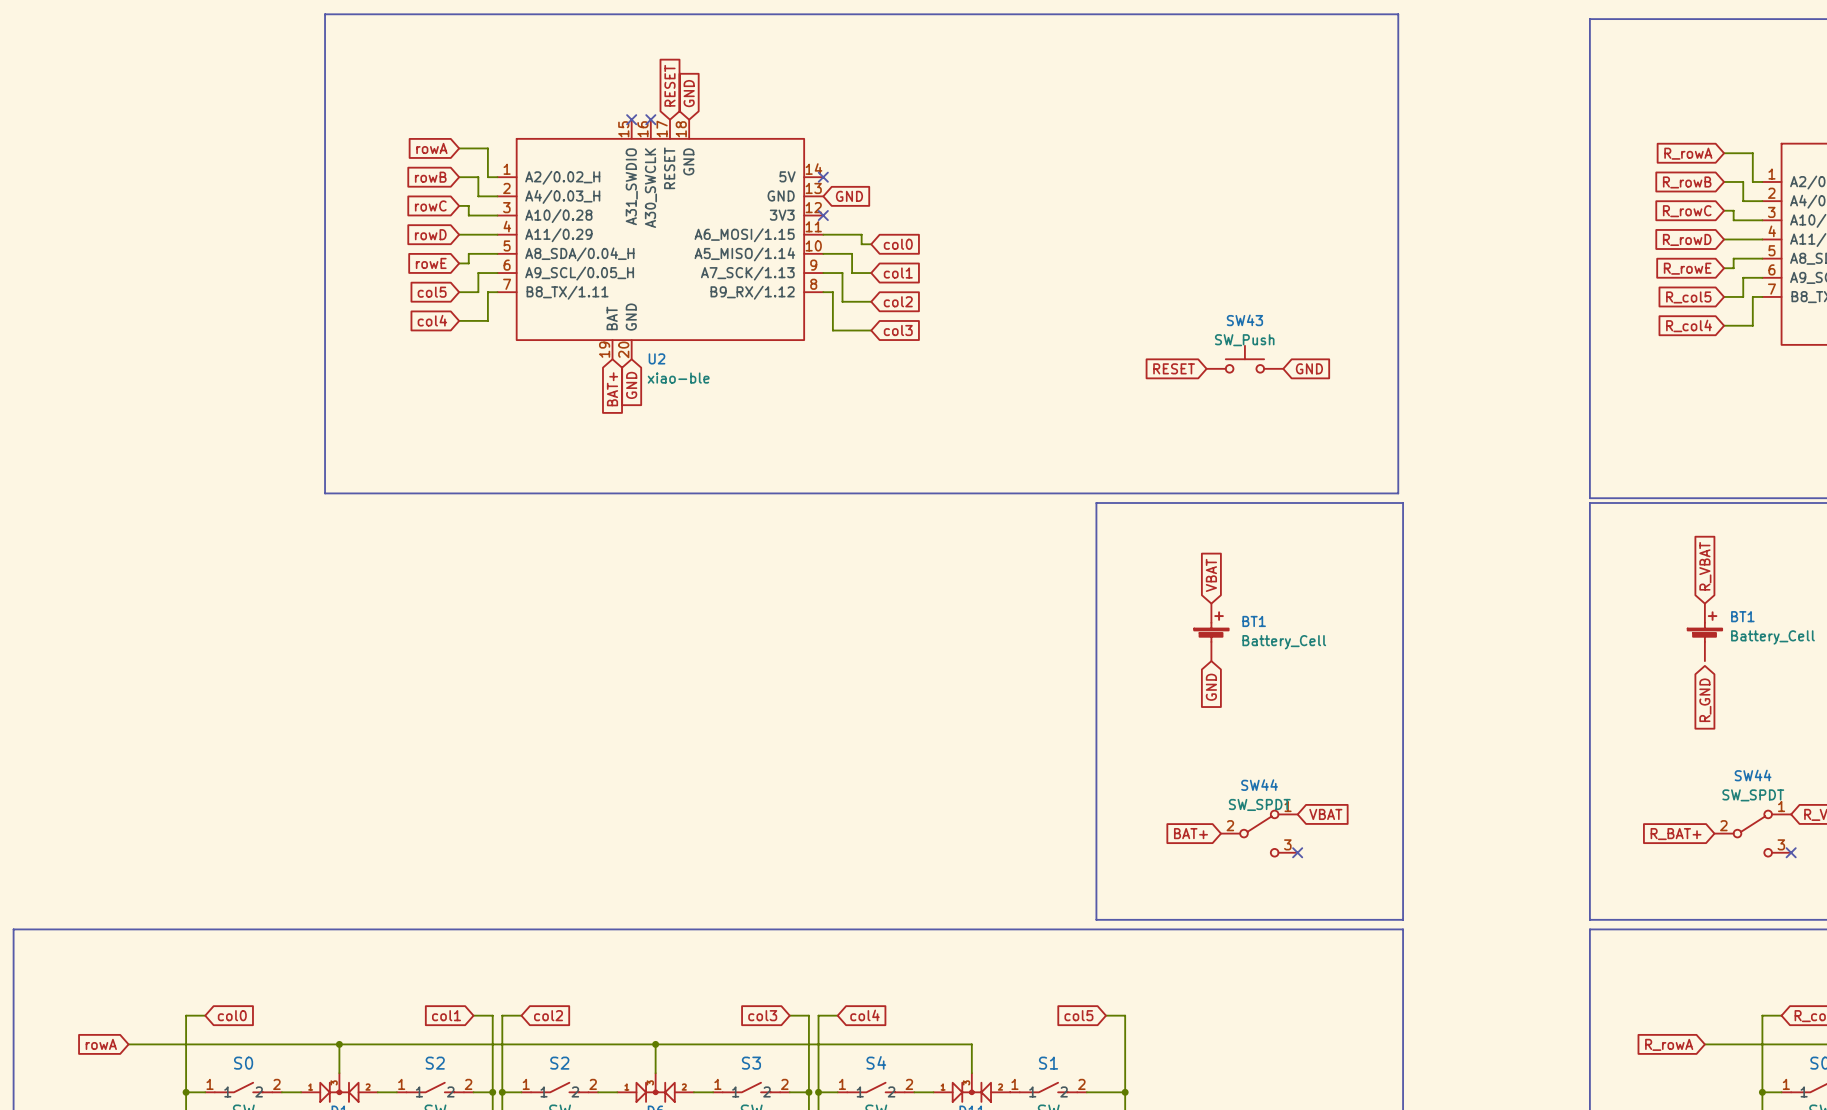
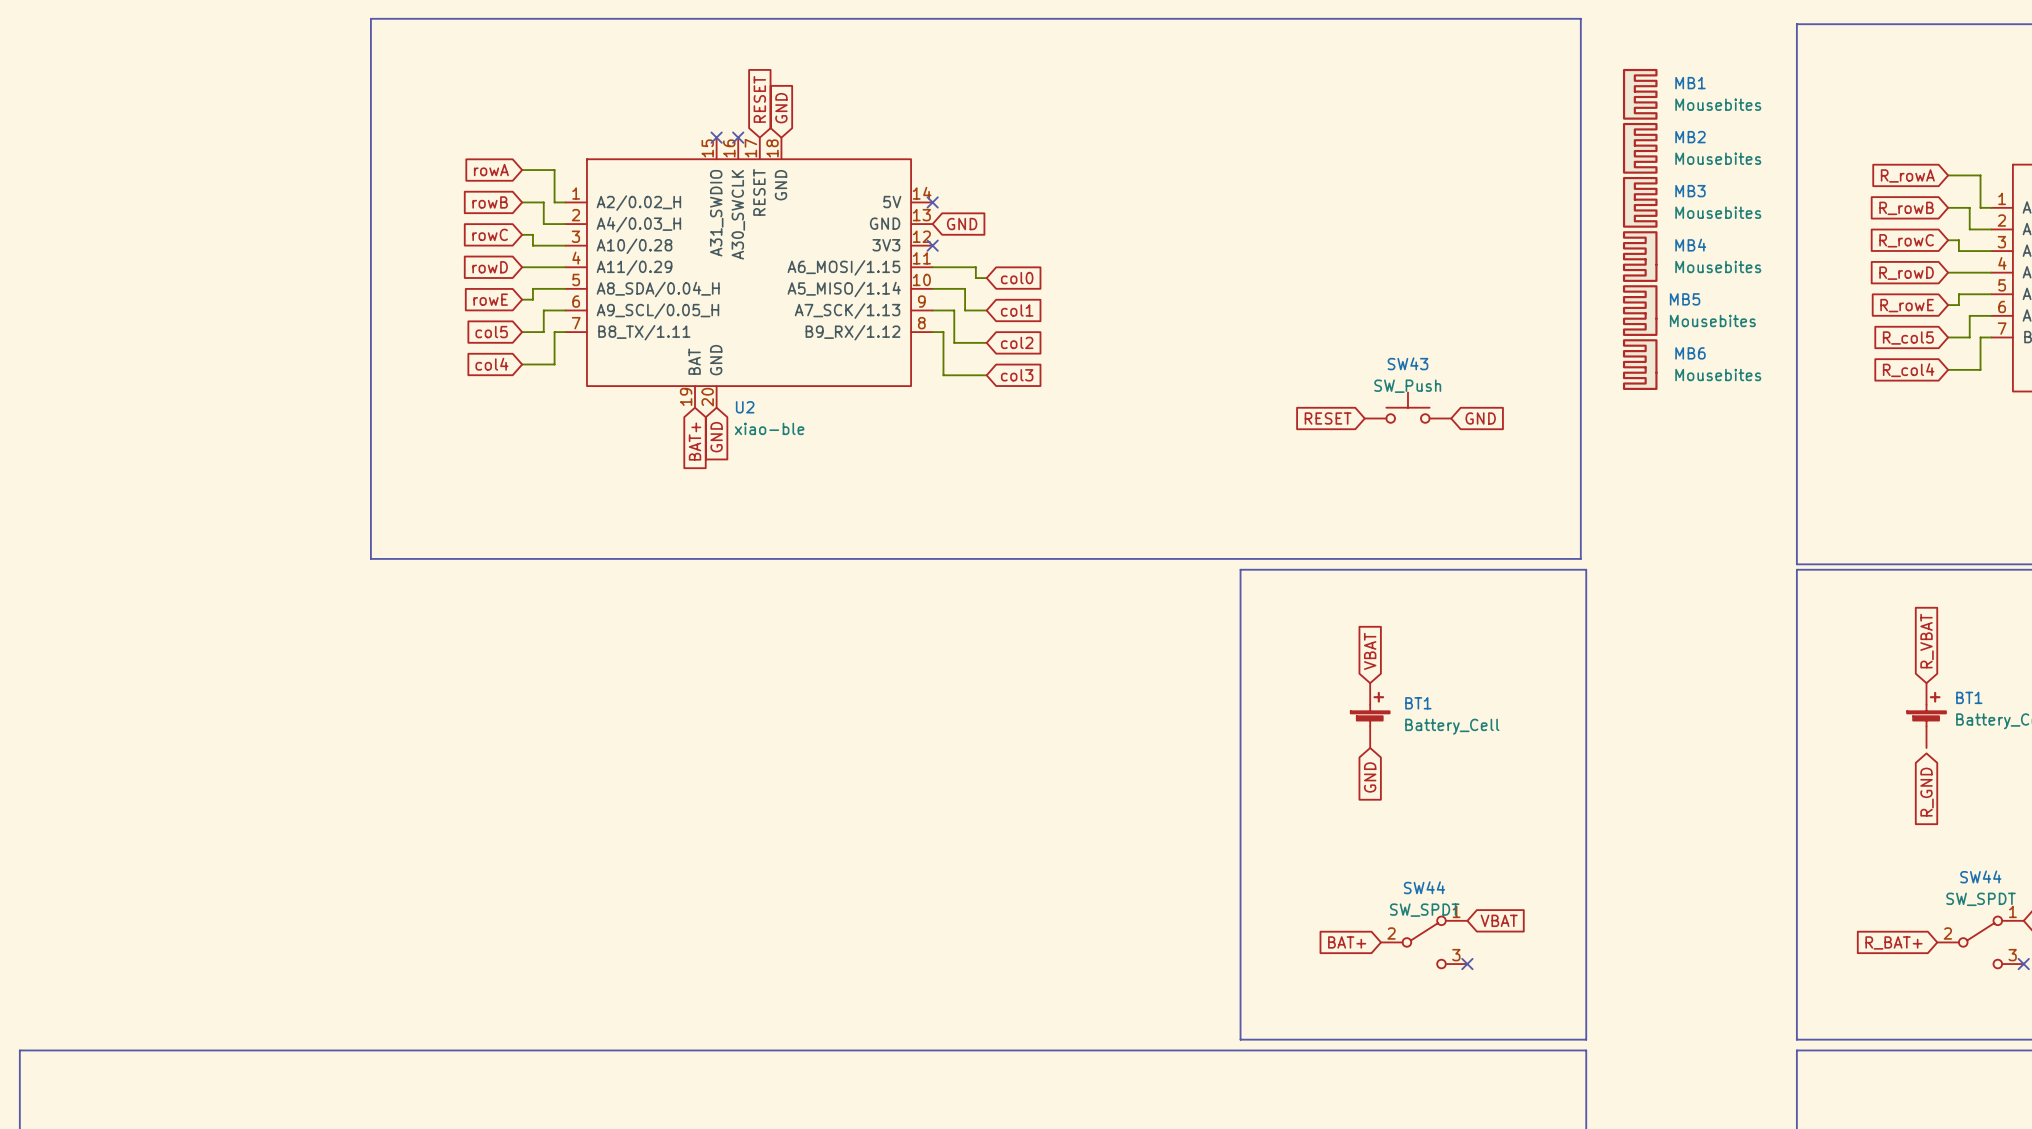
MB1: none -> Mousebites (1640, 94)
MB2: none -> Mousebites (1640, 148)
MB3: none -> Mousebites (1640, 202)
MB4: none -> Mousebites (1640, 256)
MB5: none -> Mousebites (1640, 310)
MB6: none -> Mousebites (1640, 364)

